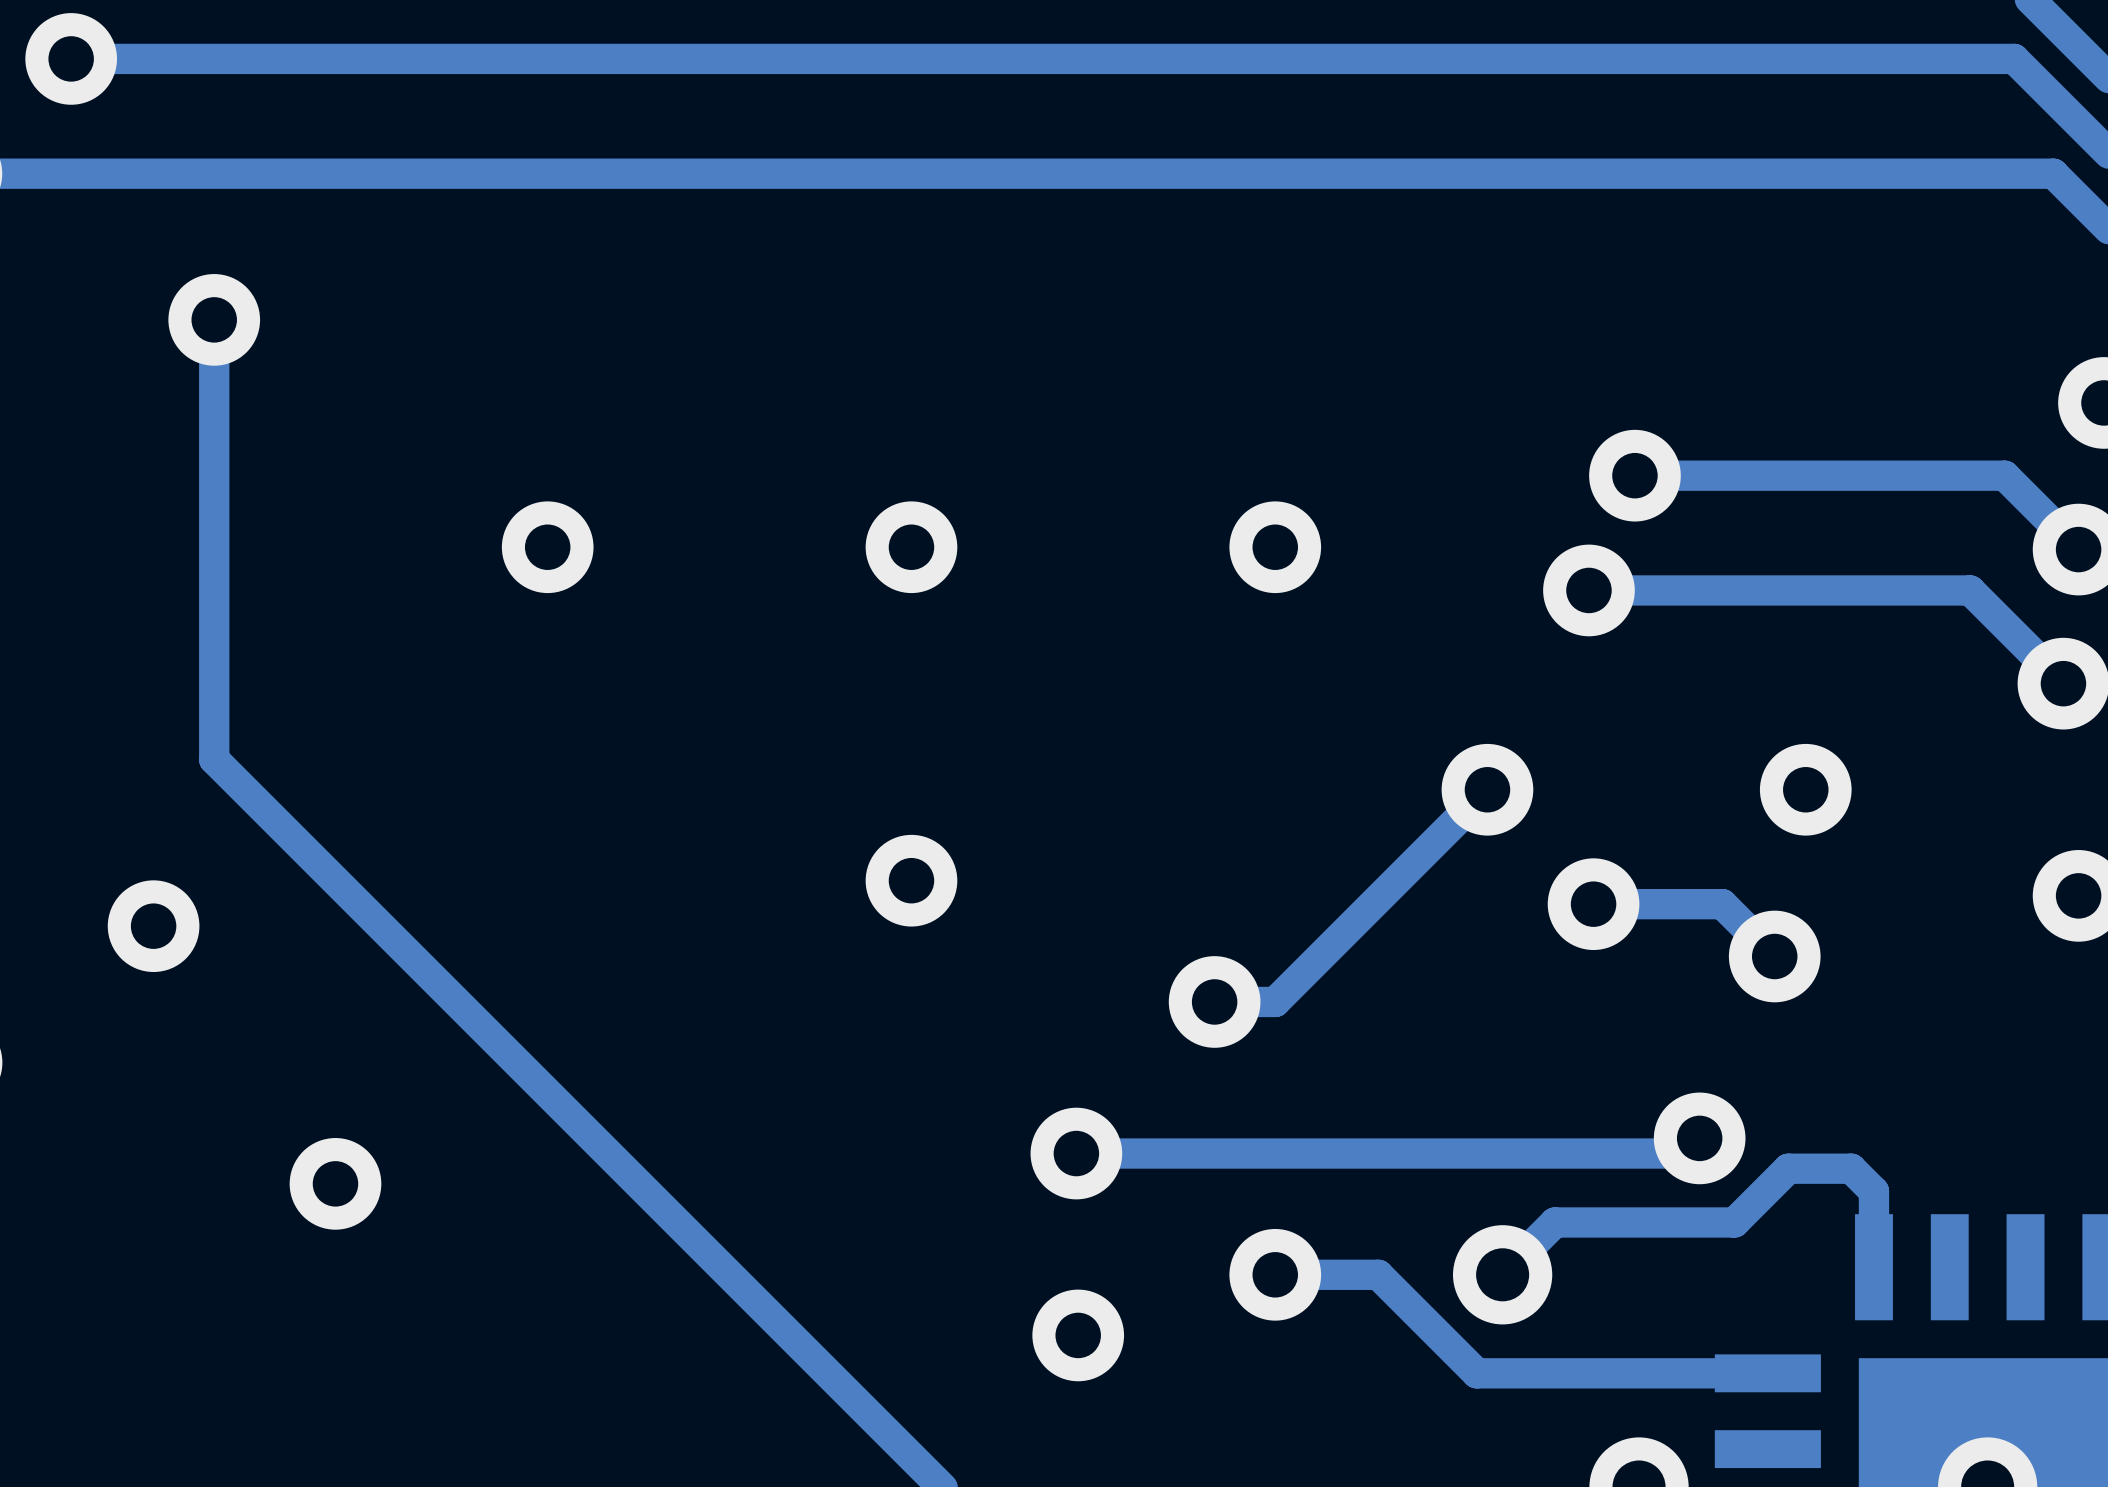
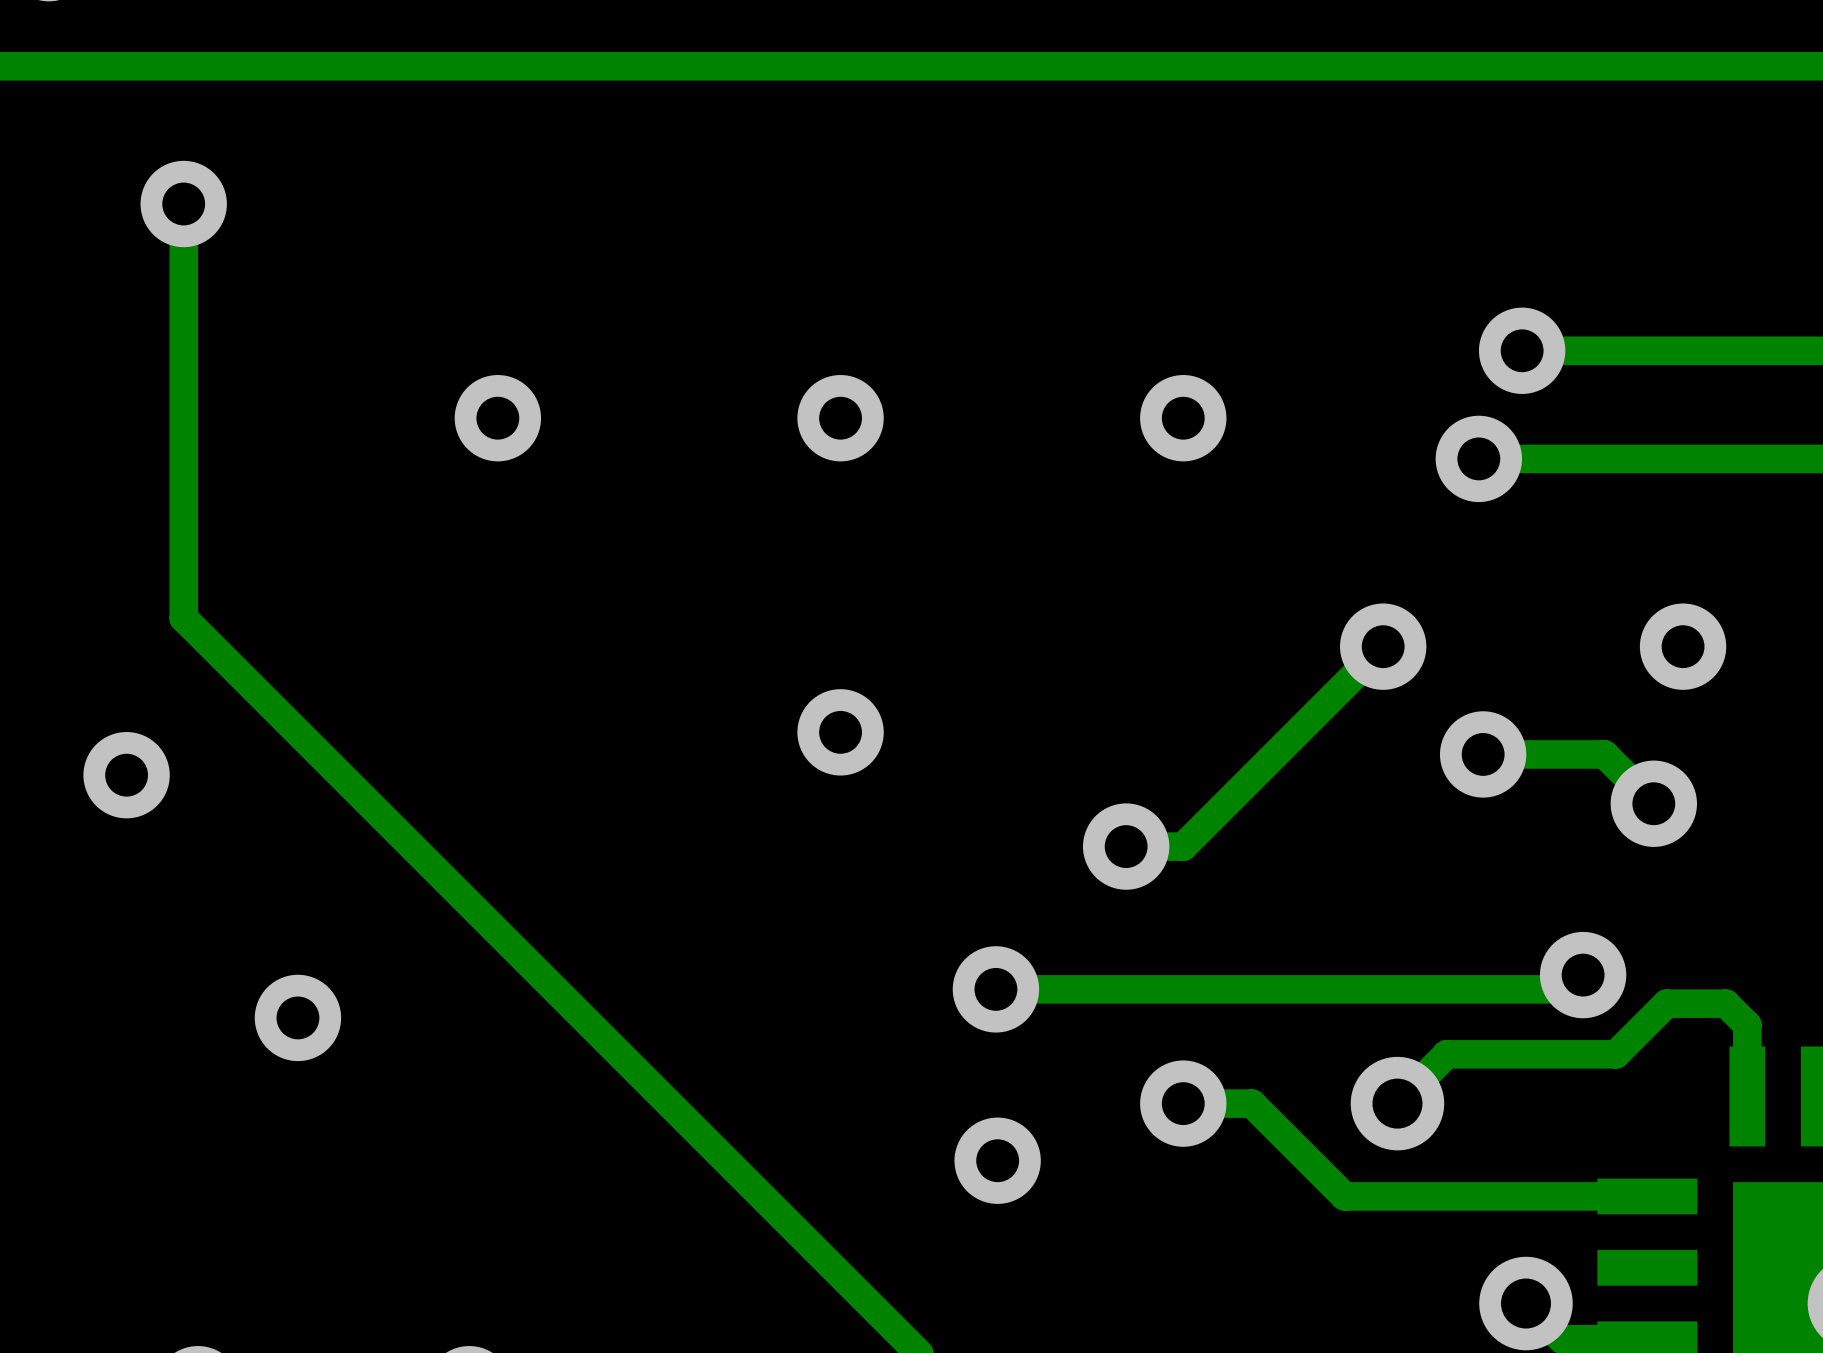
track: (1348, 1274) (1378, 1274) (1476, 1373) -> (1251, 1103) (1344, 1196) (1373, 1196)

